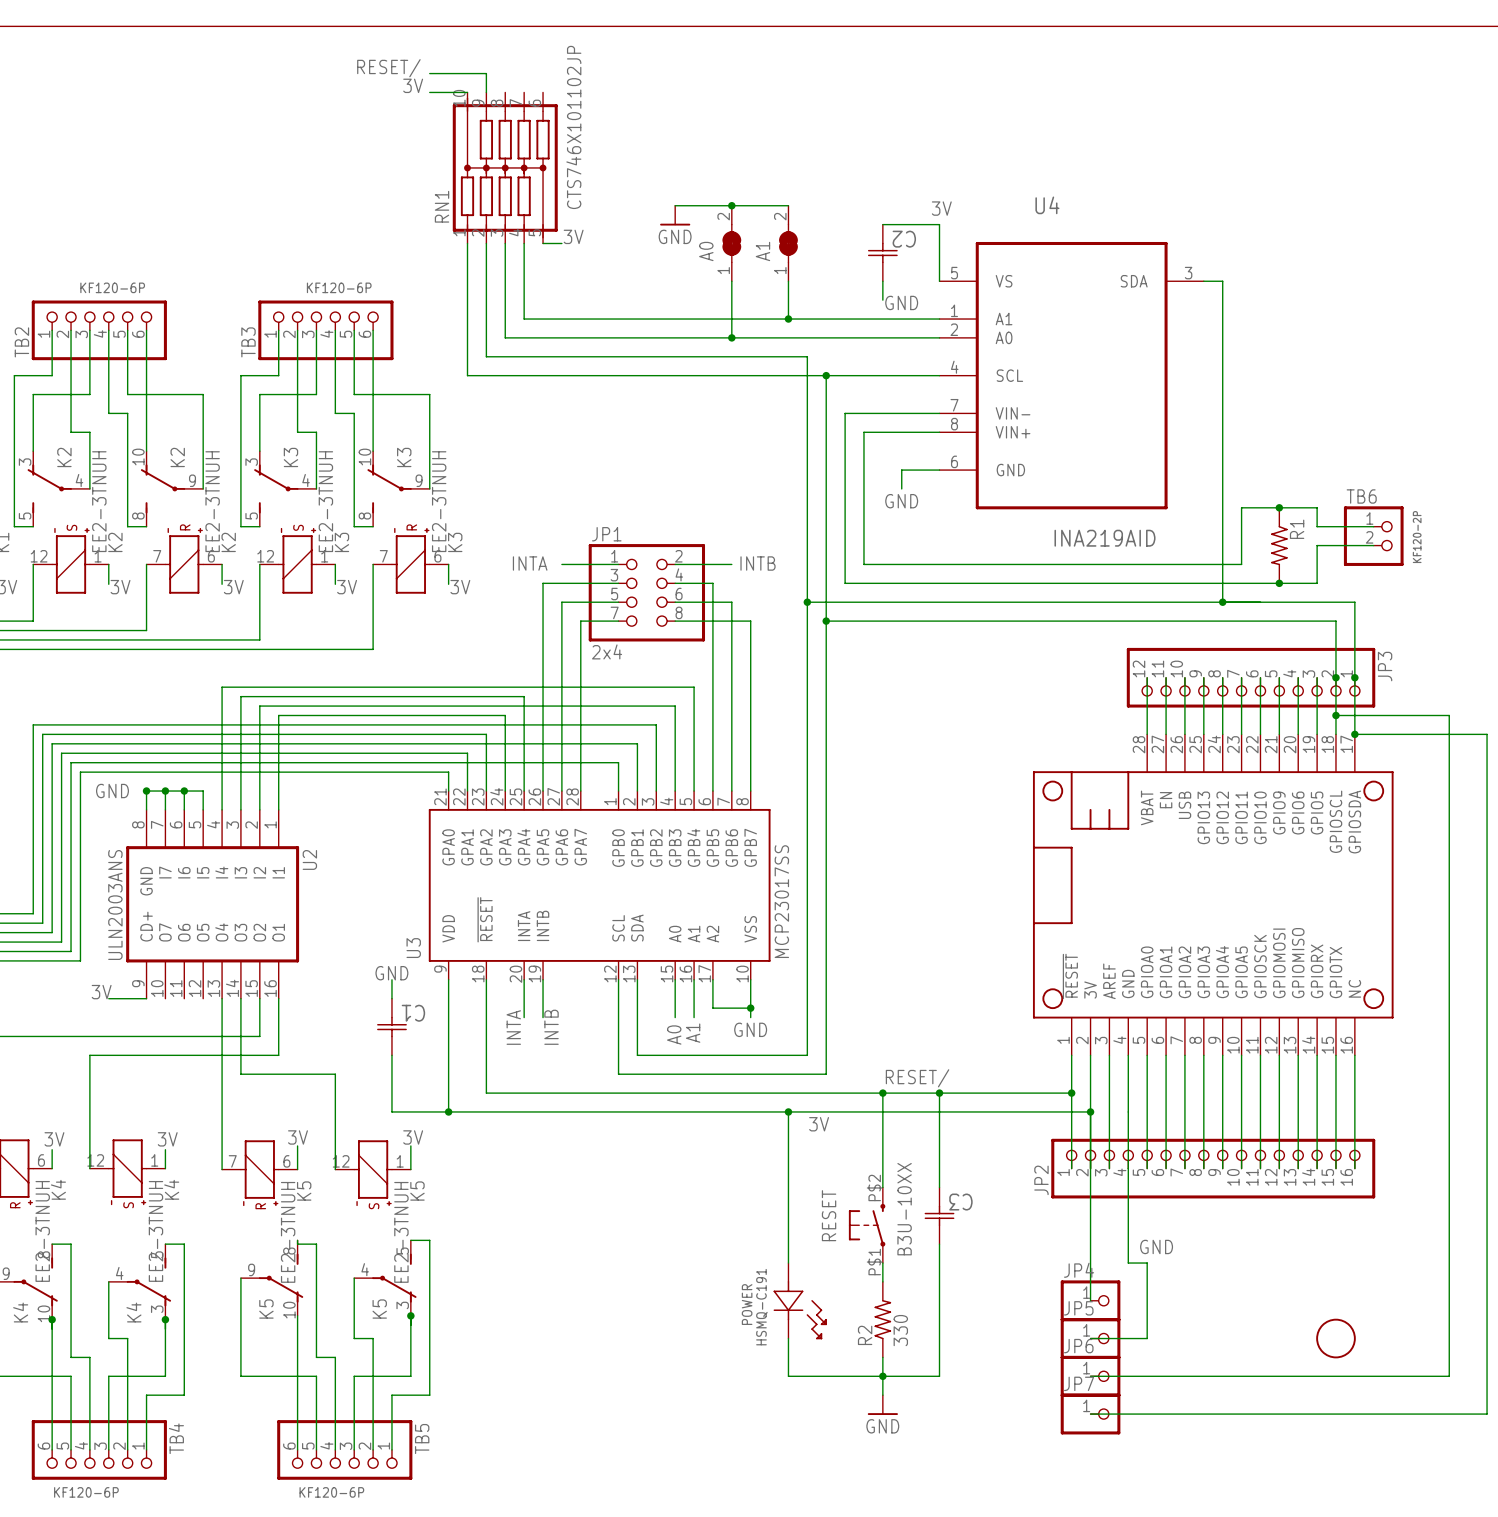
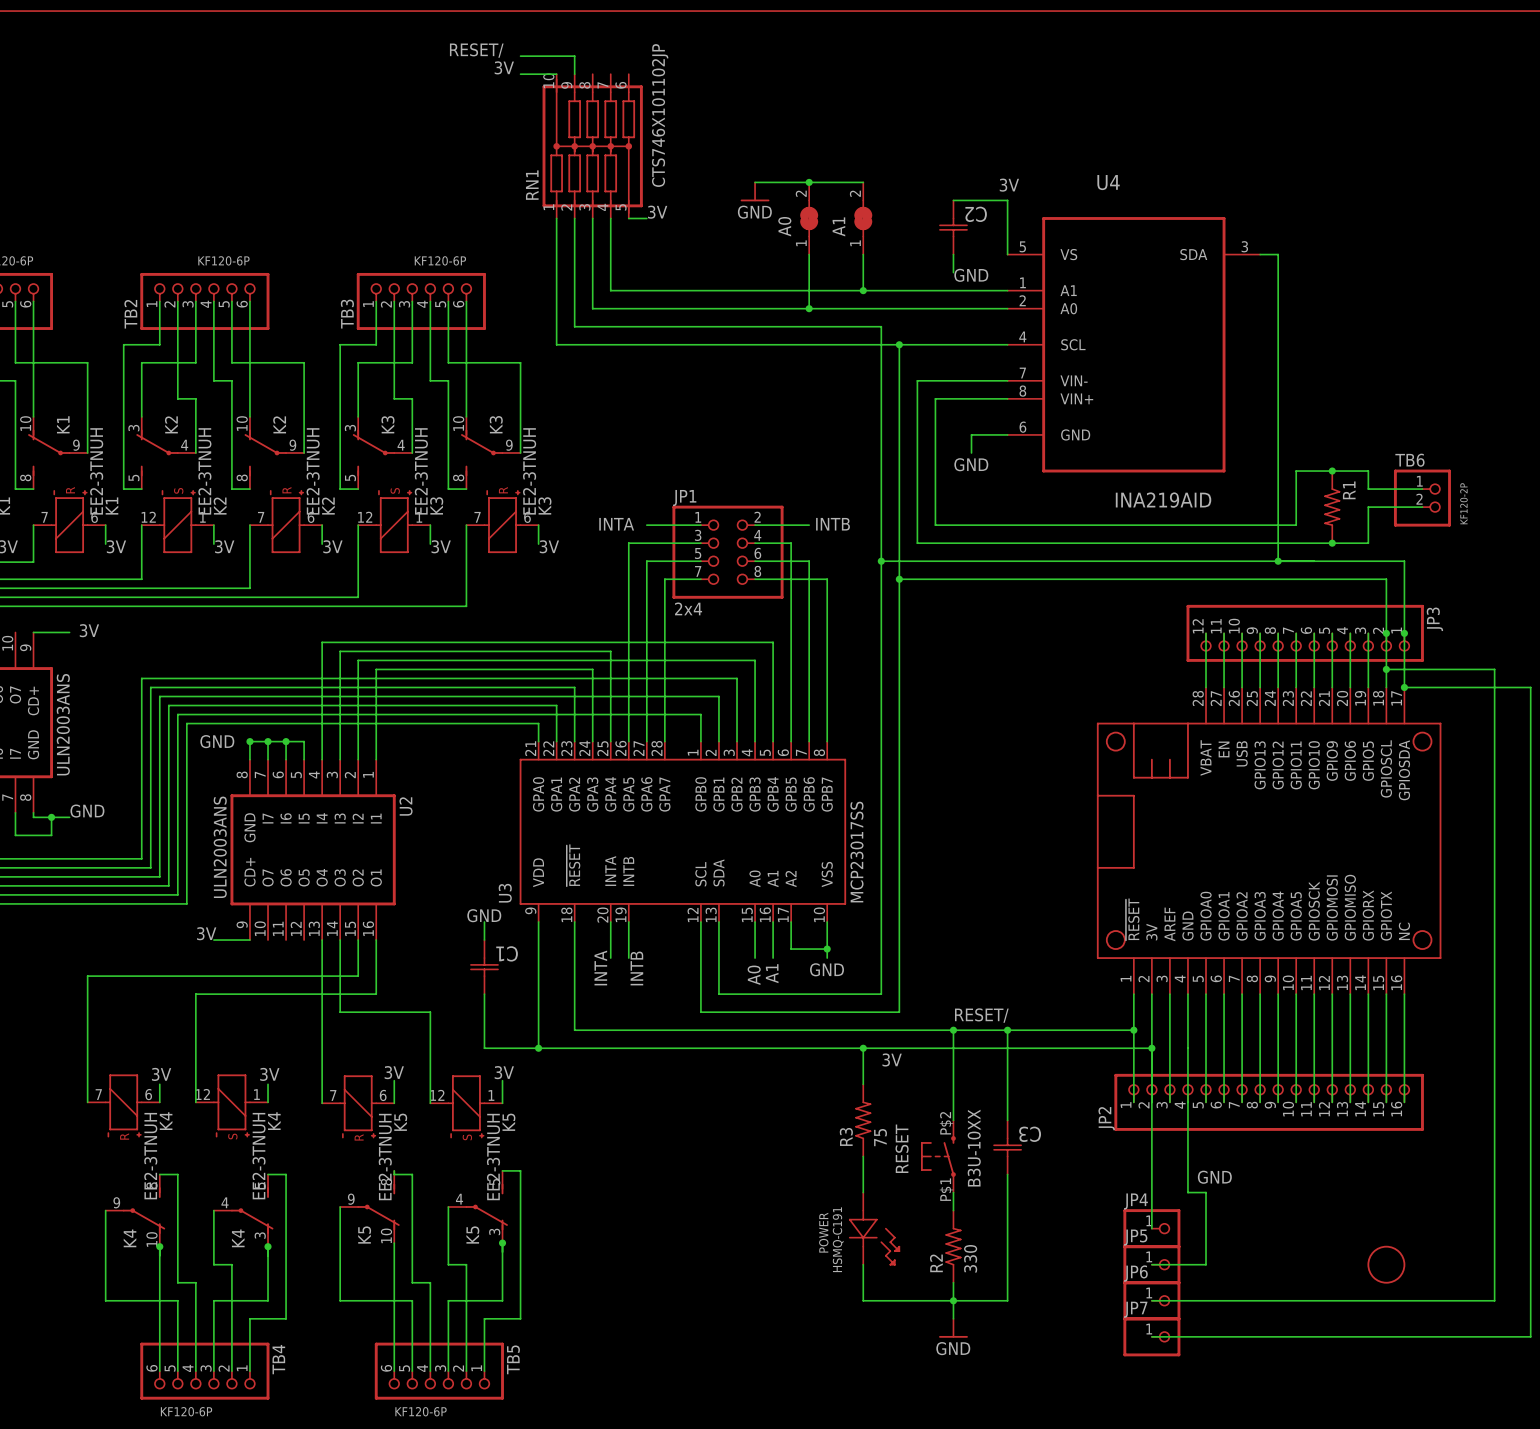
R3: none -> 75 (863, 1120)

